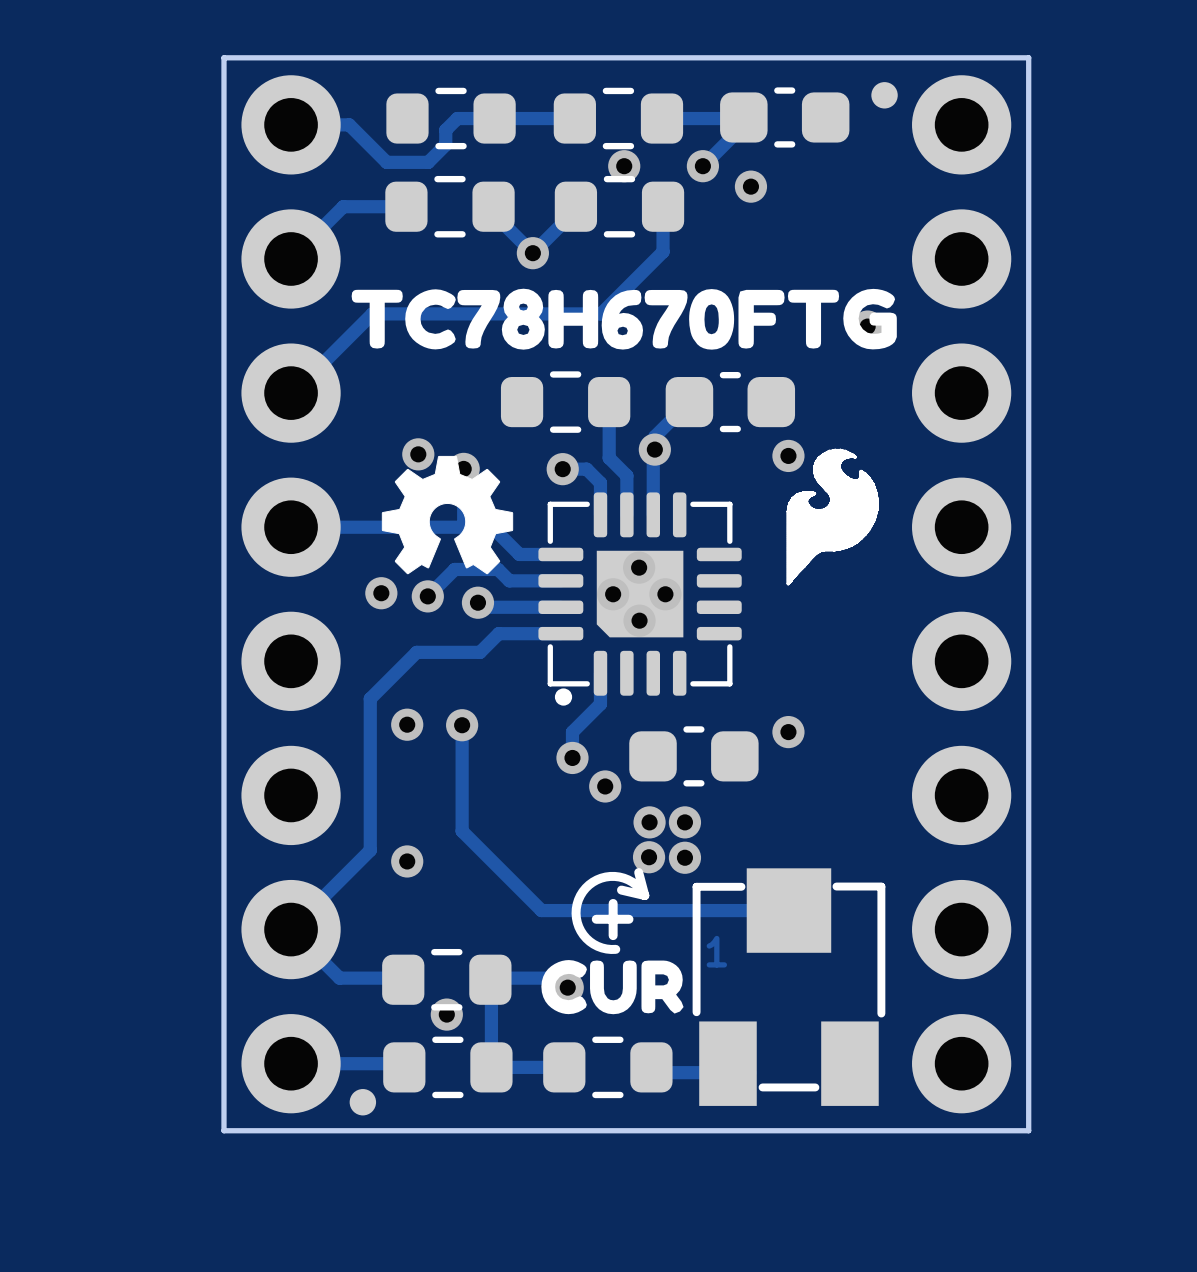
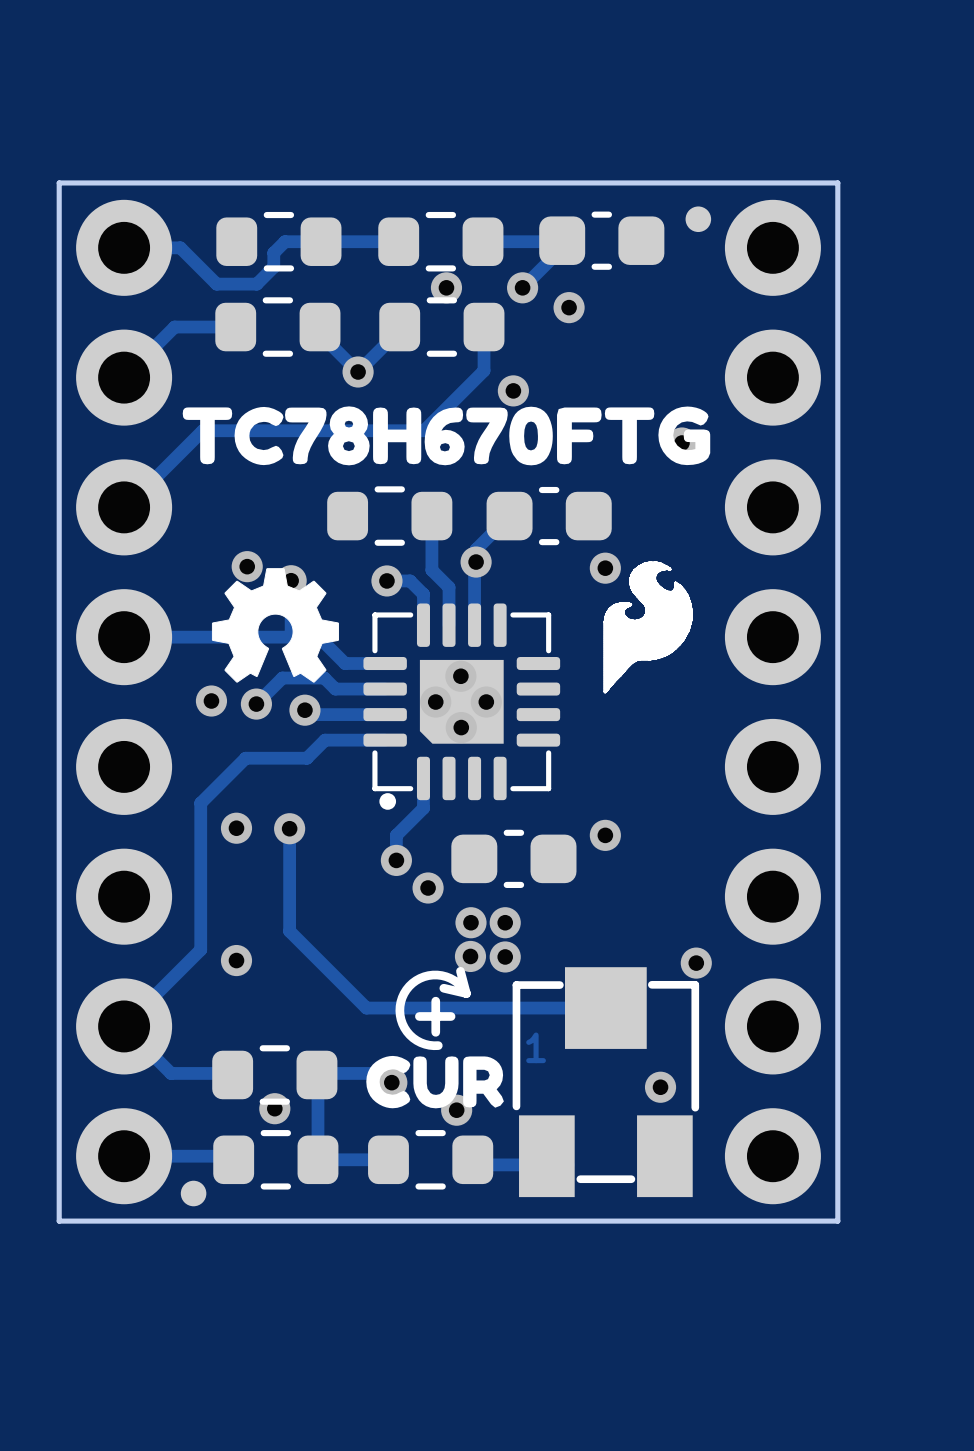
via: none -> (513, 390)
via: none -> (696, 963)
via: none -> (660, 1087)
via: none -> (456, 1110)

